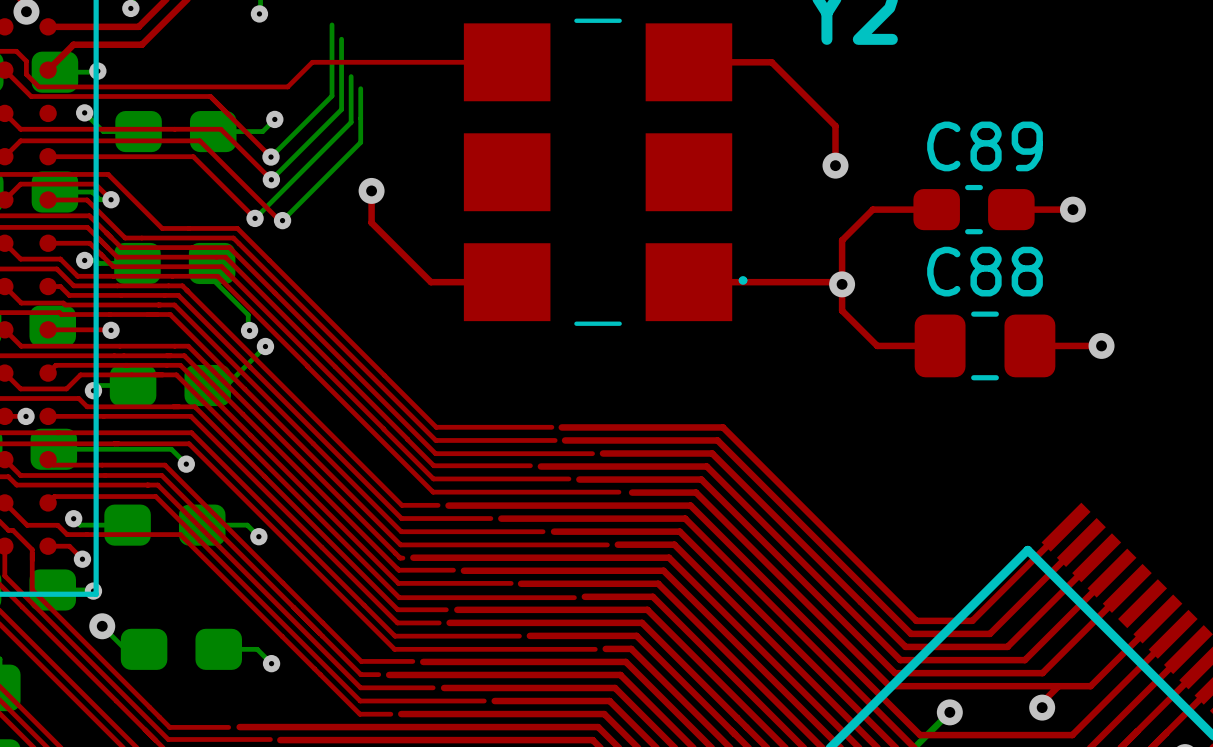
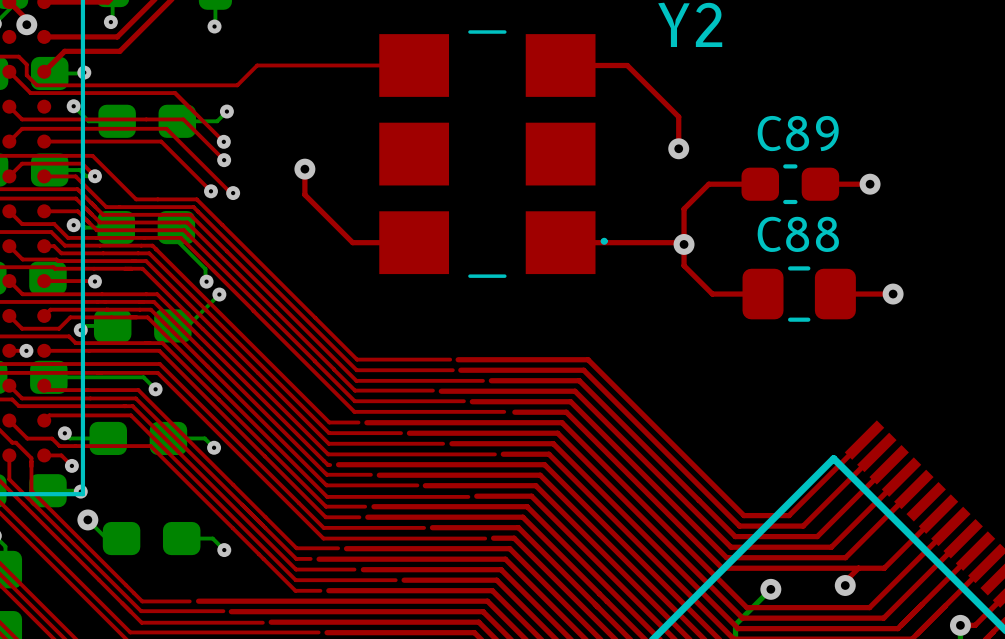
bottom track: (332, 24) (332, 96) (271, 157) -> none
bottom track: (341, 39) (341, 109) (271, 179) -> none
bottom track: (351, 76) (351, 122) (255, 218) -> none
bottom track: (360, 88) (360, 142) (282, 220) -> none

